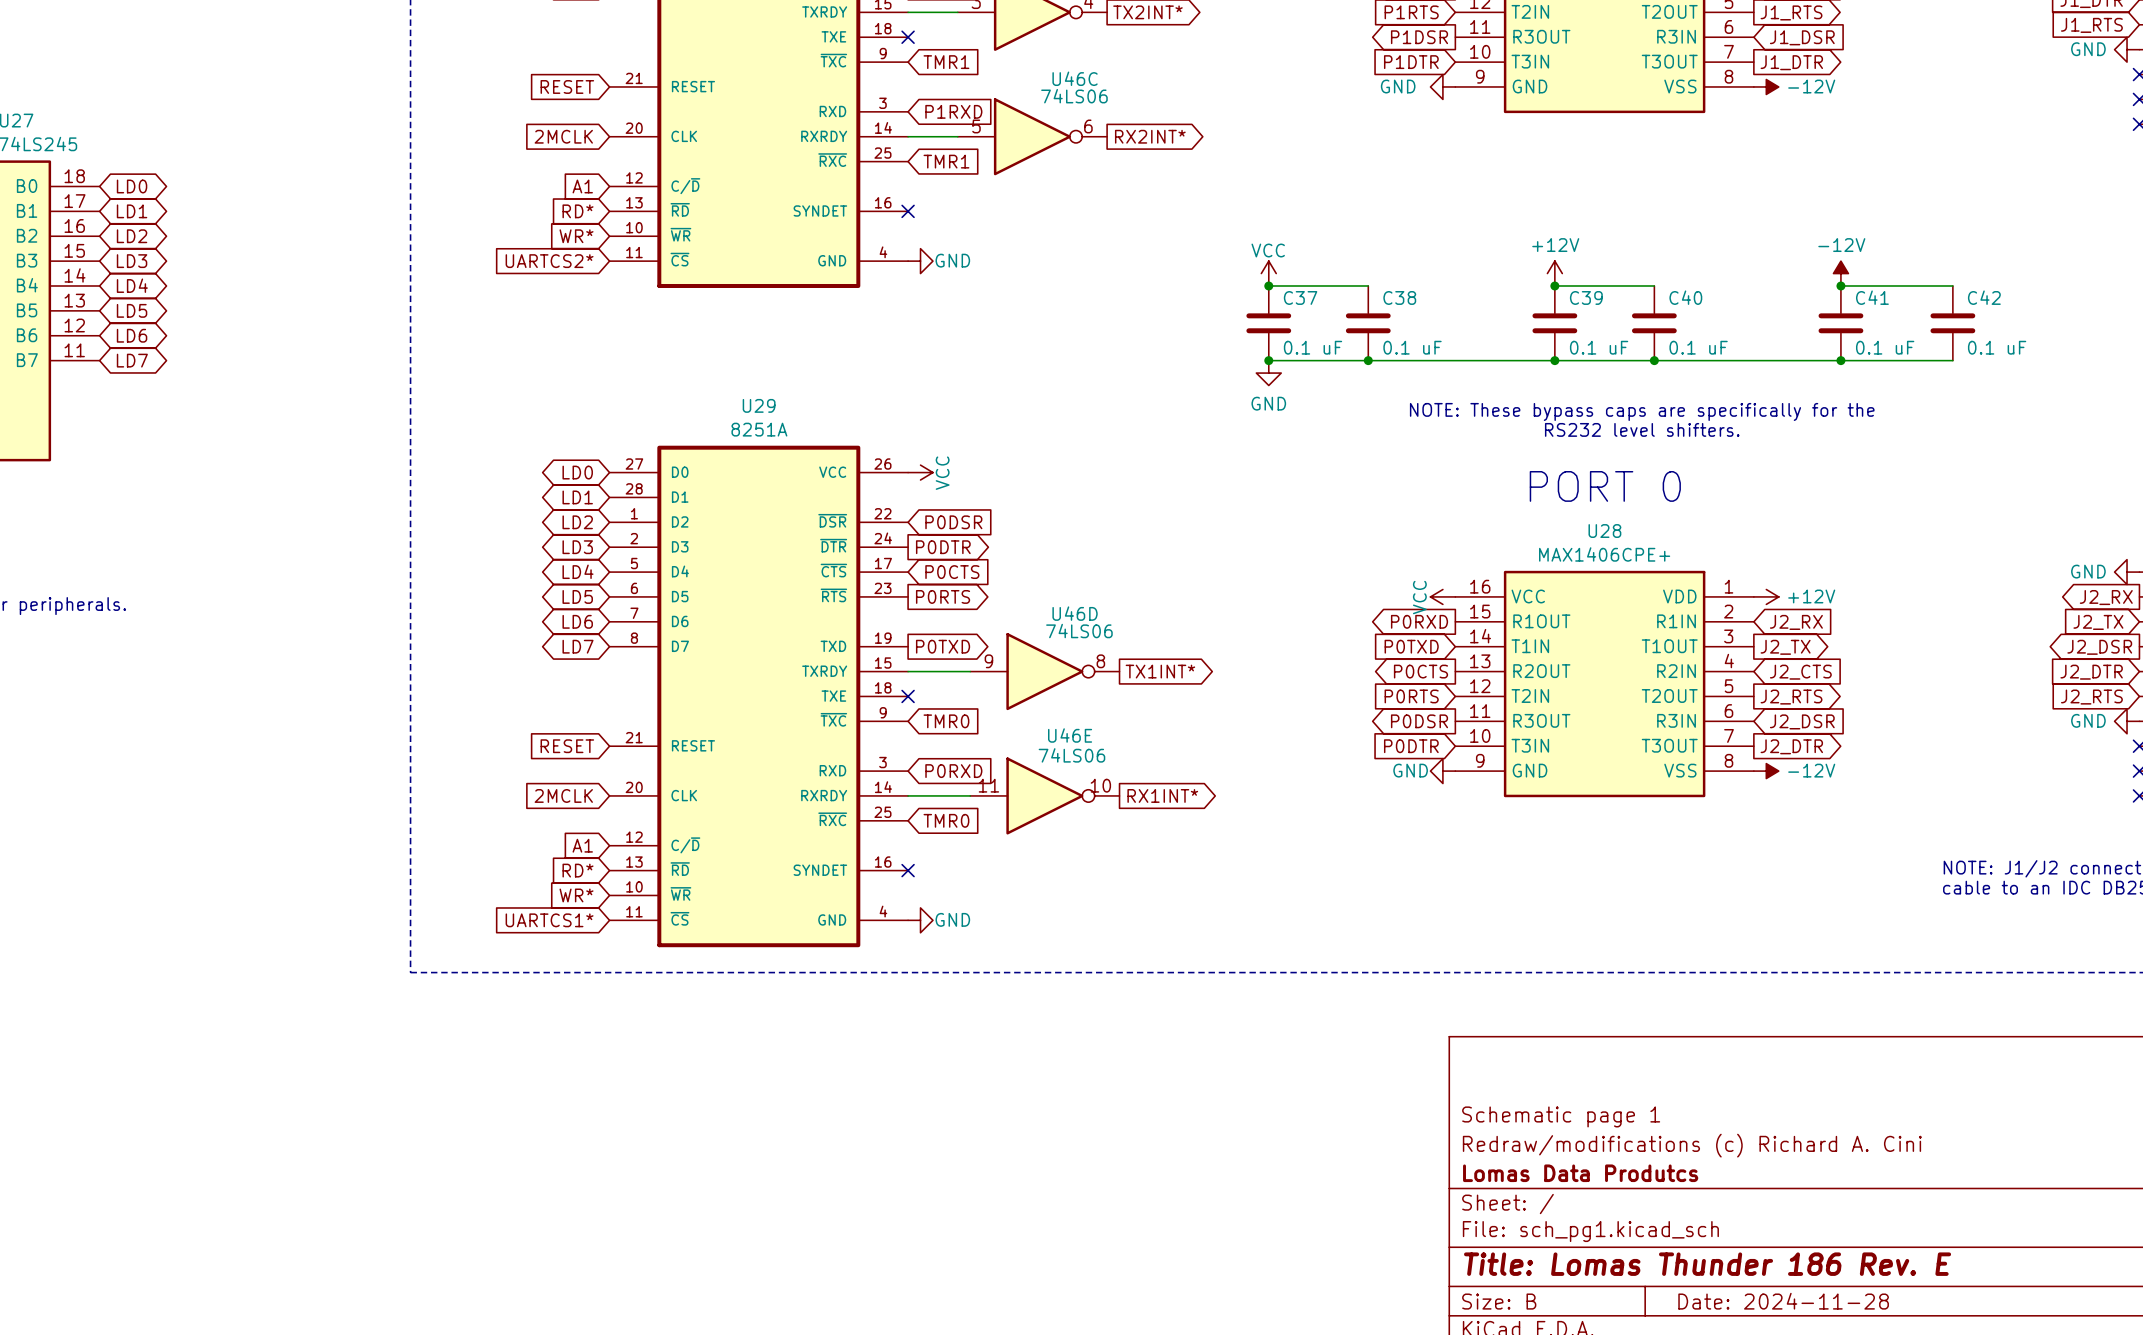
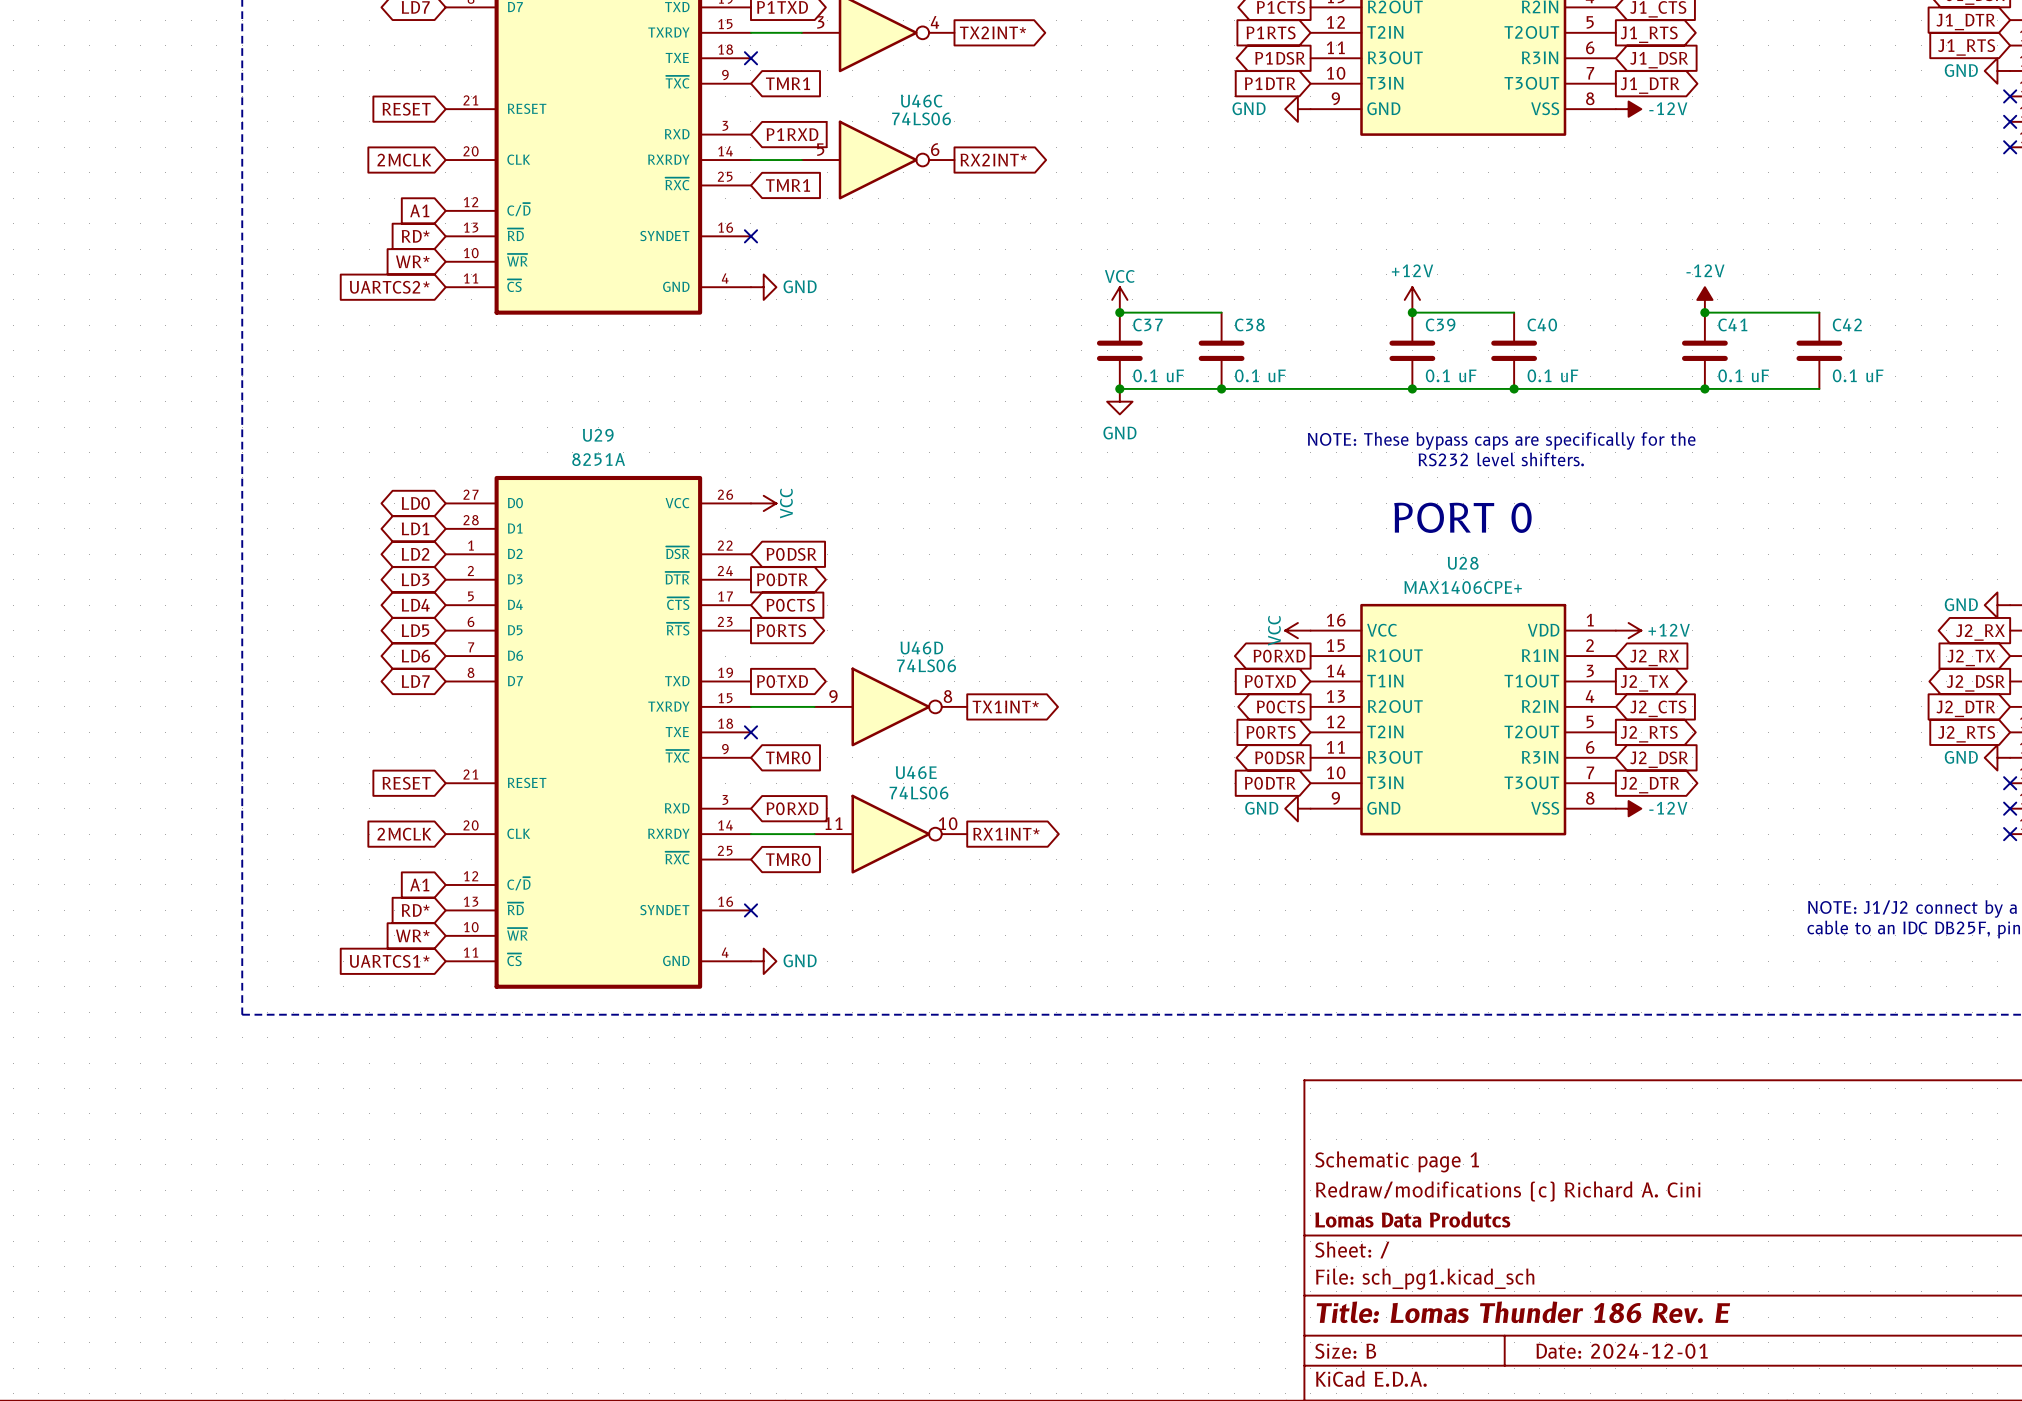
title block: Date: 2024-11-28 (1783, 1301) -> Date: 2024-12-01 (1622, 1351)

